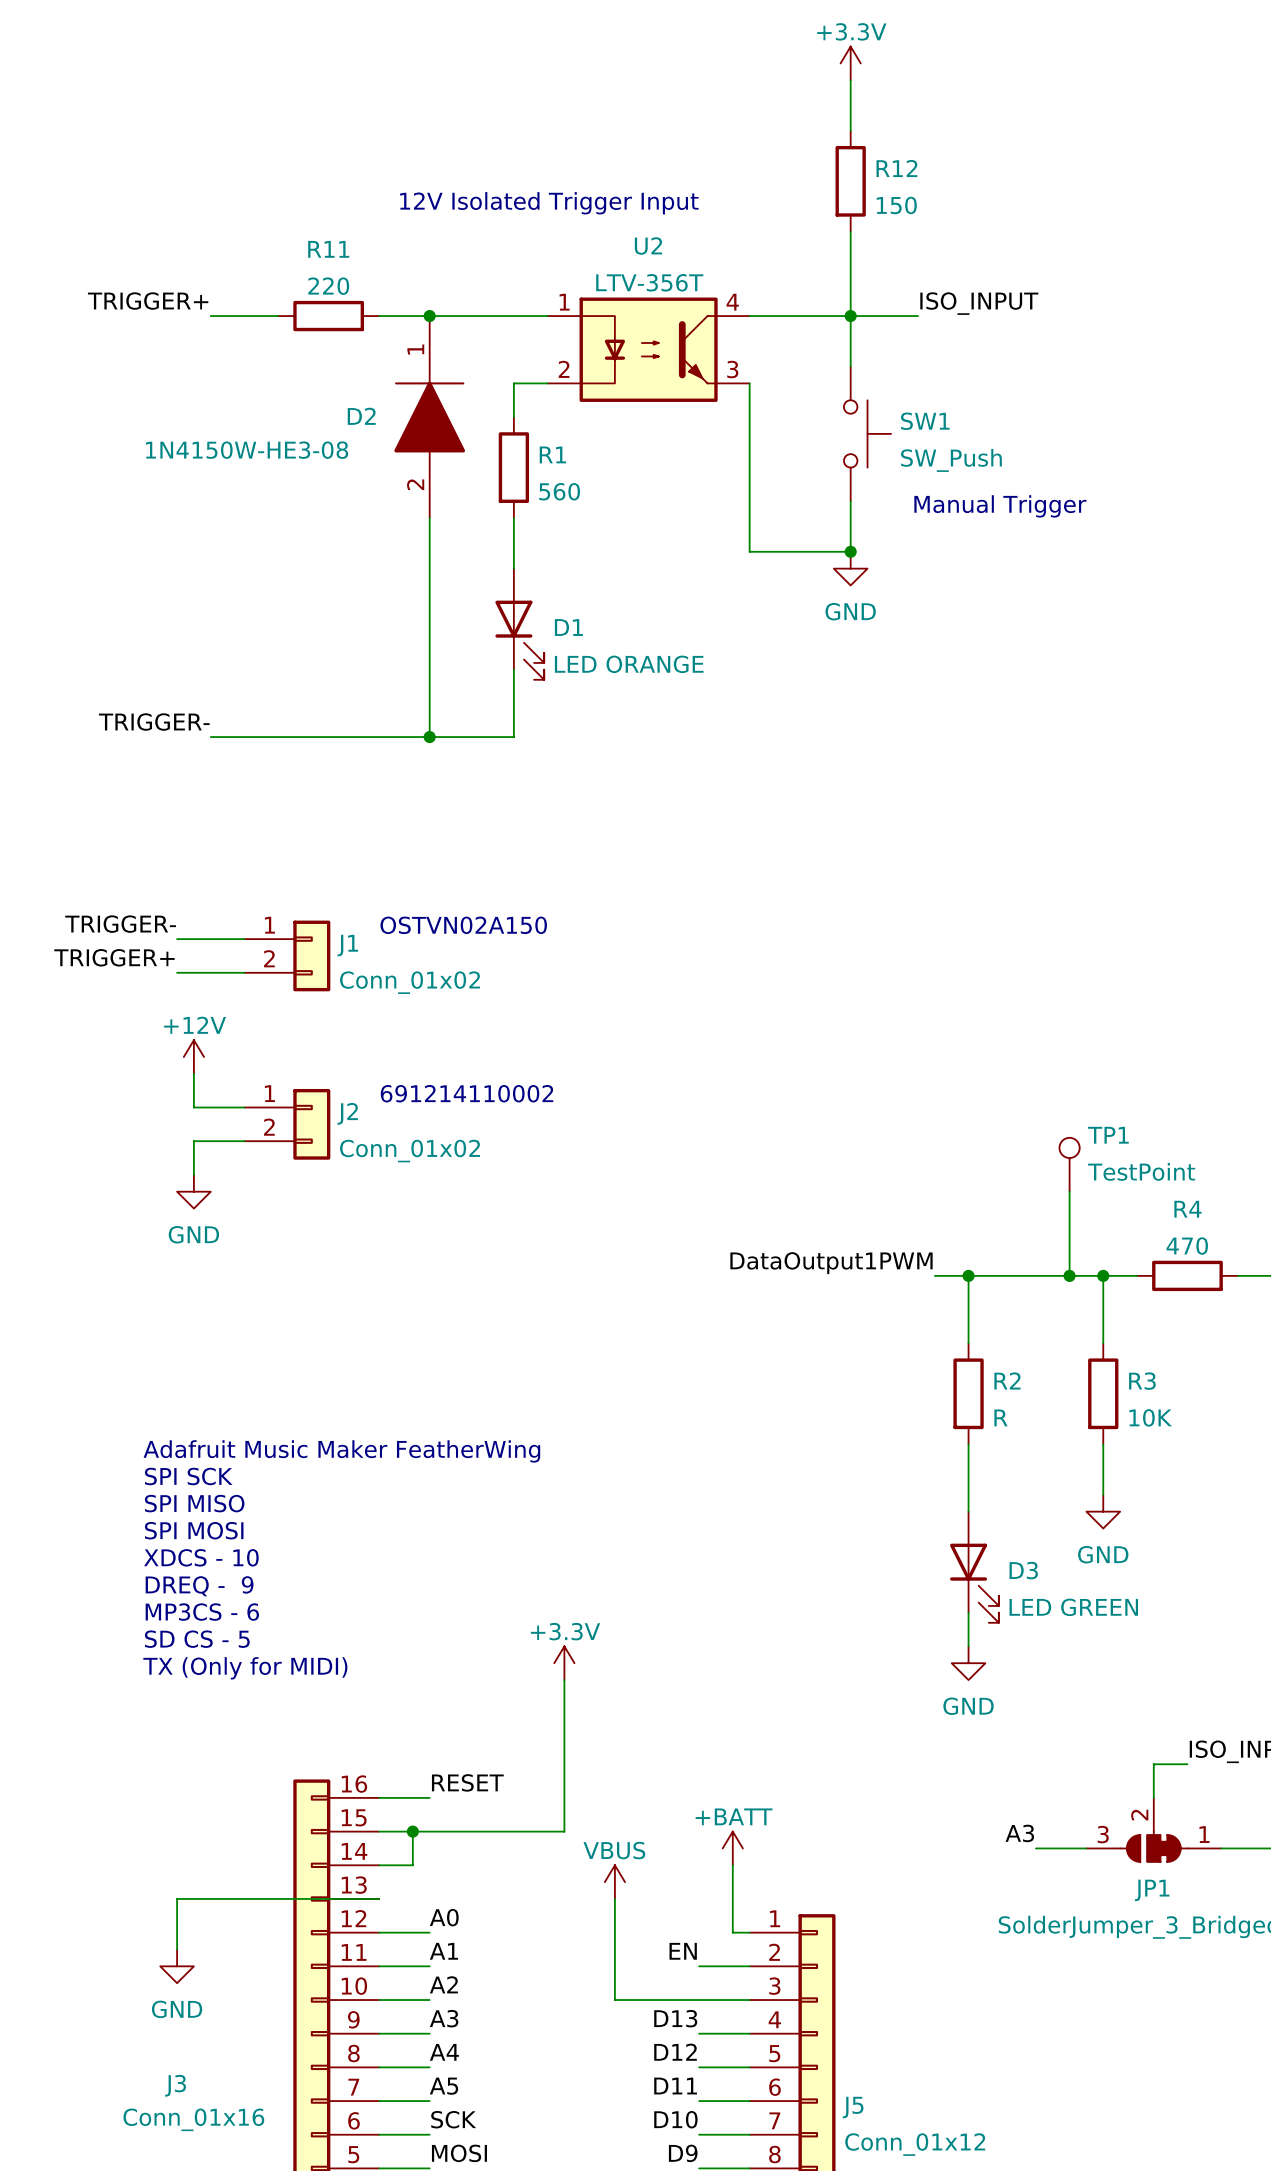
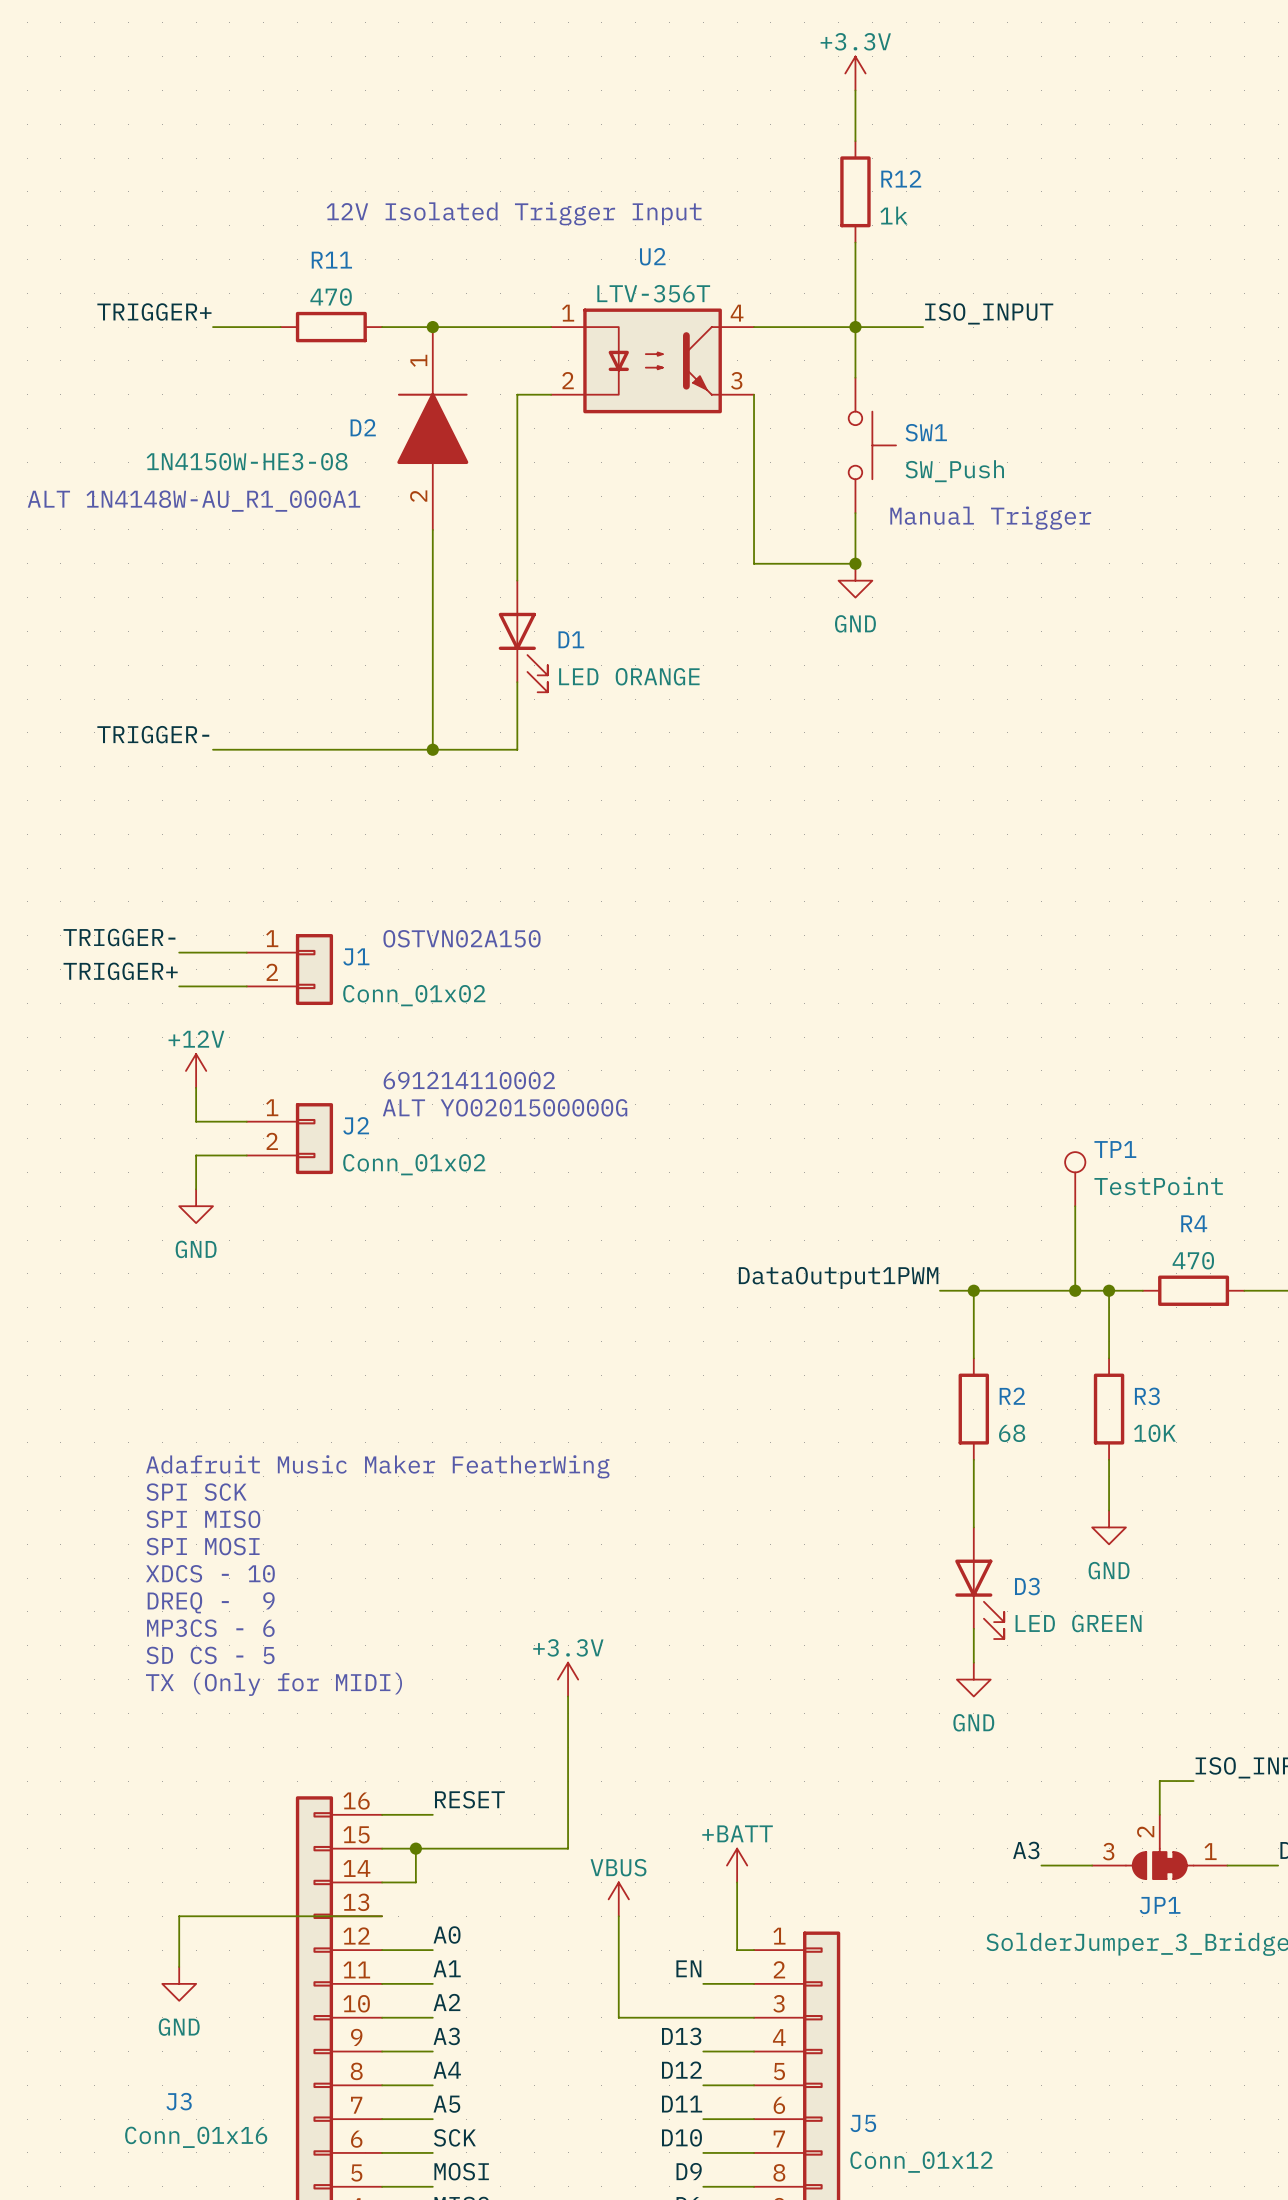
R12 value: 150 (896, 205) -> 1k (893, 215)
R11 value: 220 (328, 286) -> 470 (331, 297)
wire: none -> (517, 428) (517, 529)
R1: 560 (513, 467) -> none
text: none -> ALT 1N4148W-AU_R1_000A1 (193, 501)
text: none -> 691214110002 (469, 1080)
text: 691214110002 (466, 1093) -> ALT YO0201500000G (505, 1107)
R2 value: R (1000, 1417) -> 68 (1012, 1433)

